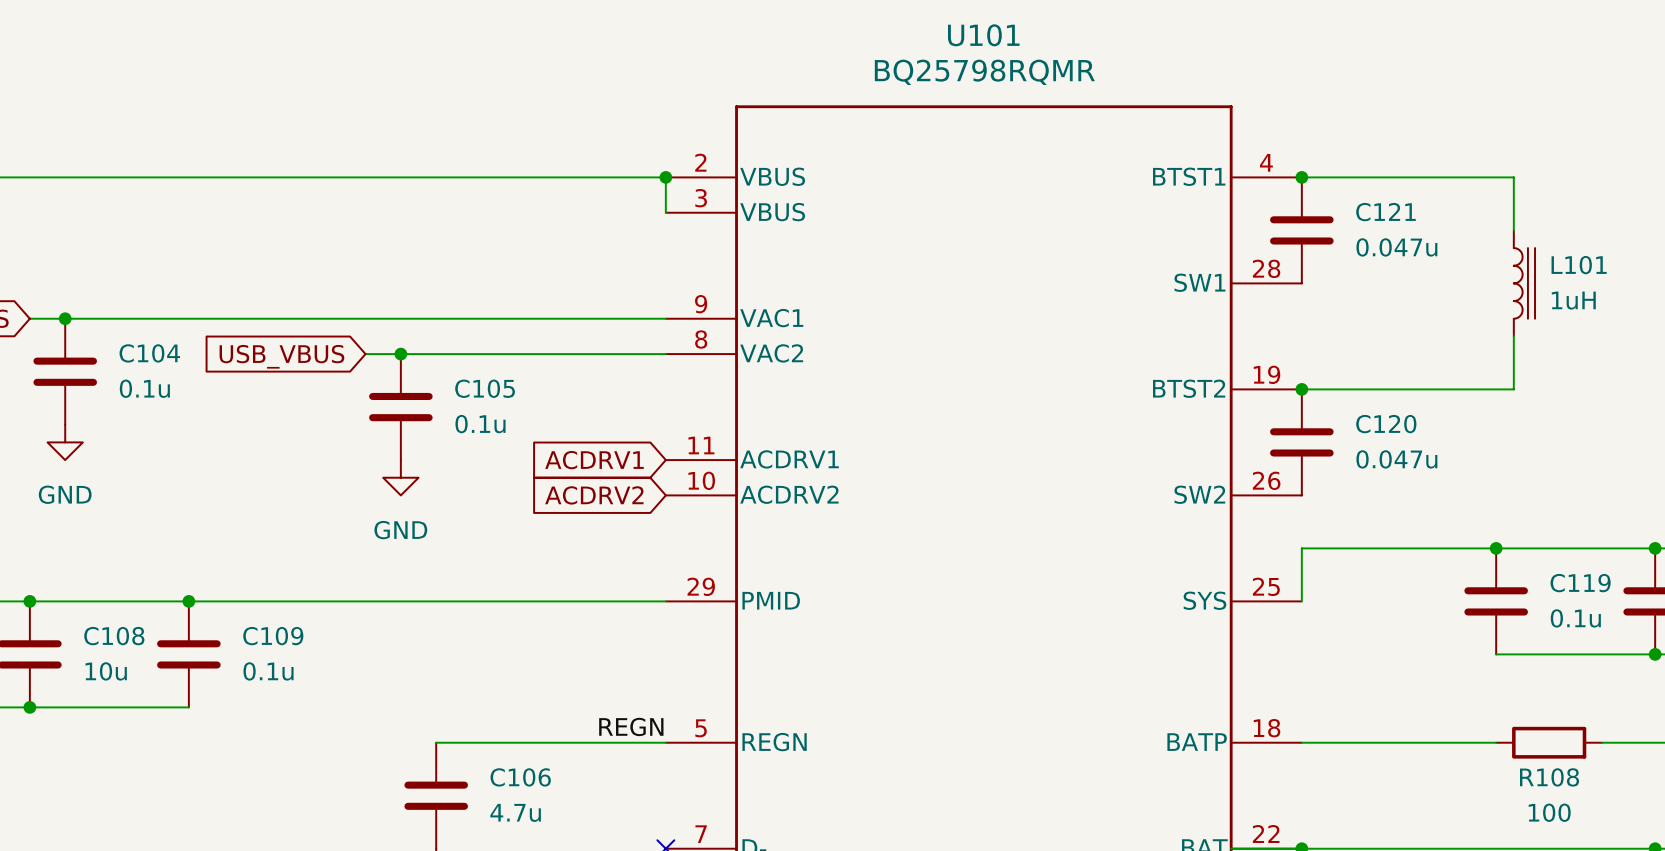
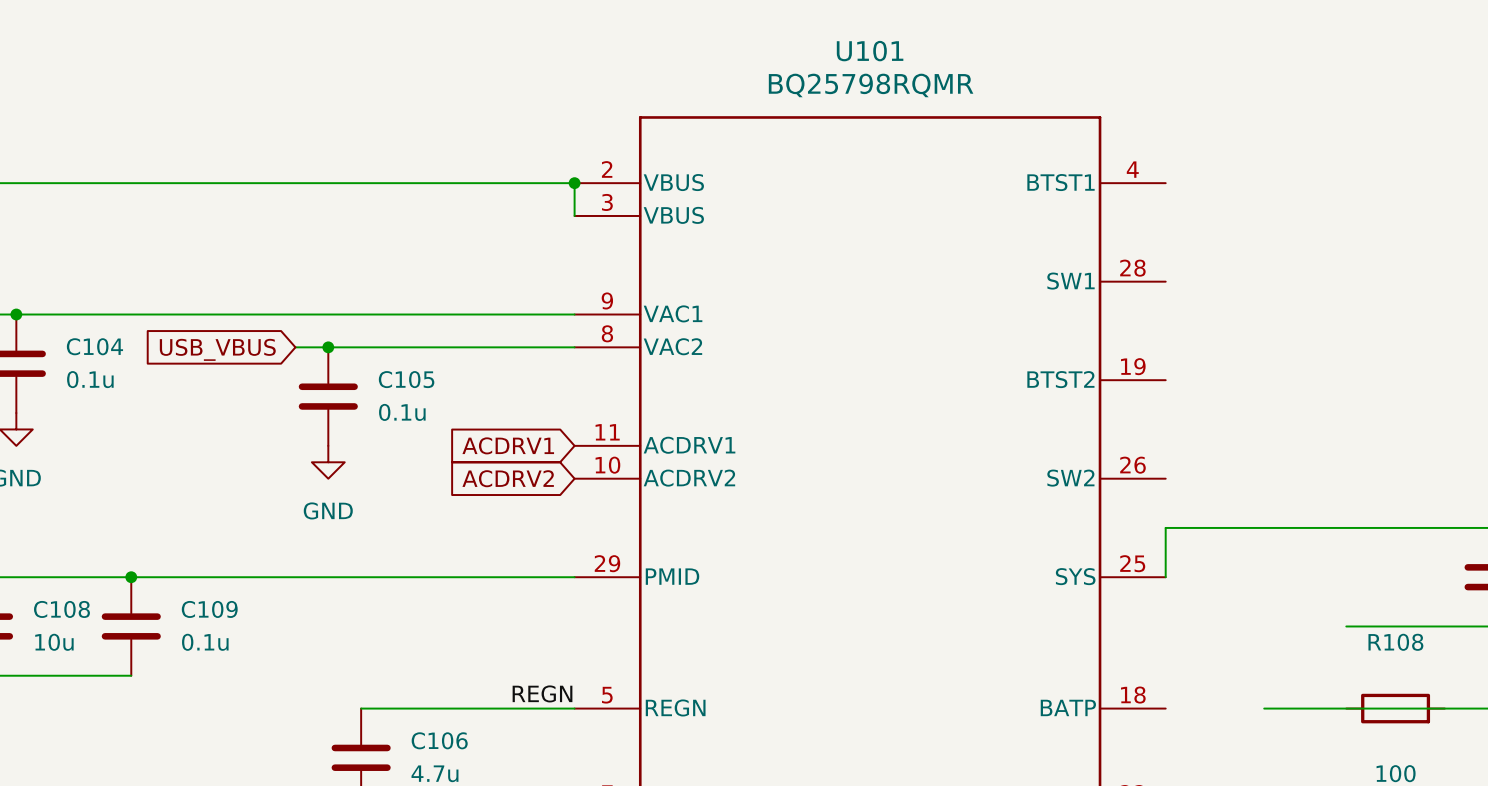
wire: (1301, 177) (1513, 177) (1513, 230) -> none
junction: (1301, 177) -> none
C121: 0.047u (1301, 230) -> none
L101: 1uH (1524, 283) -> none
wire: (1513, 336) (1513, 389) (1301, 389) -> none
junction: (1301, 389) -> none
C120: 0.047u (1301, 442) -> none
junction: (1496, 548) -> none
C119: 0.1u (1496, 601) -> none
wire: (1301, 742) (1407, 742) -> (1346, 708) (1444, 708)
R108 name position: R108 (1549, 777) -> R108 (1395, 642)

